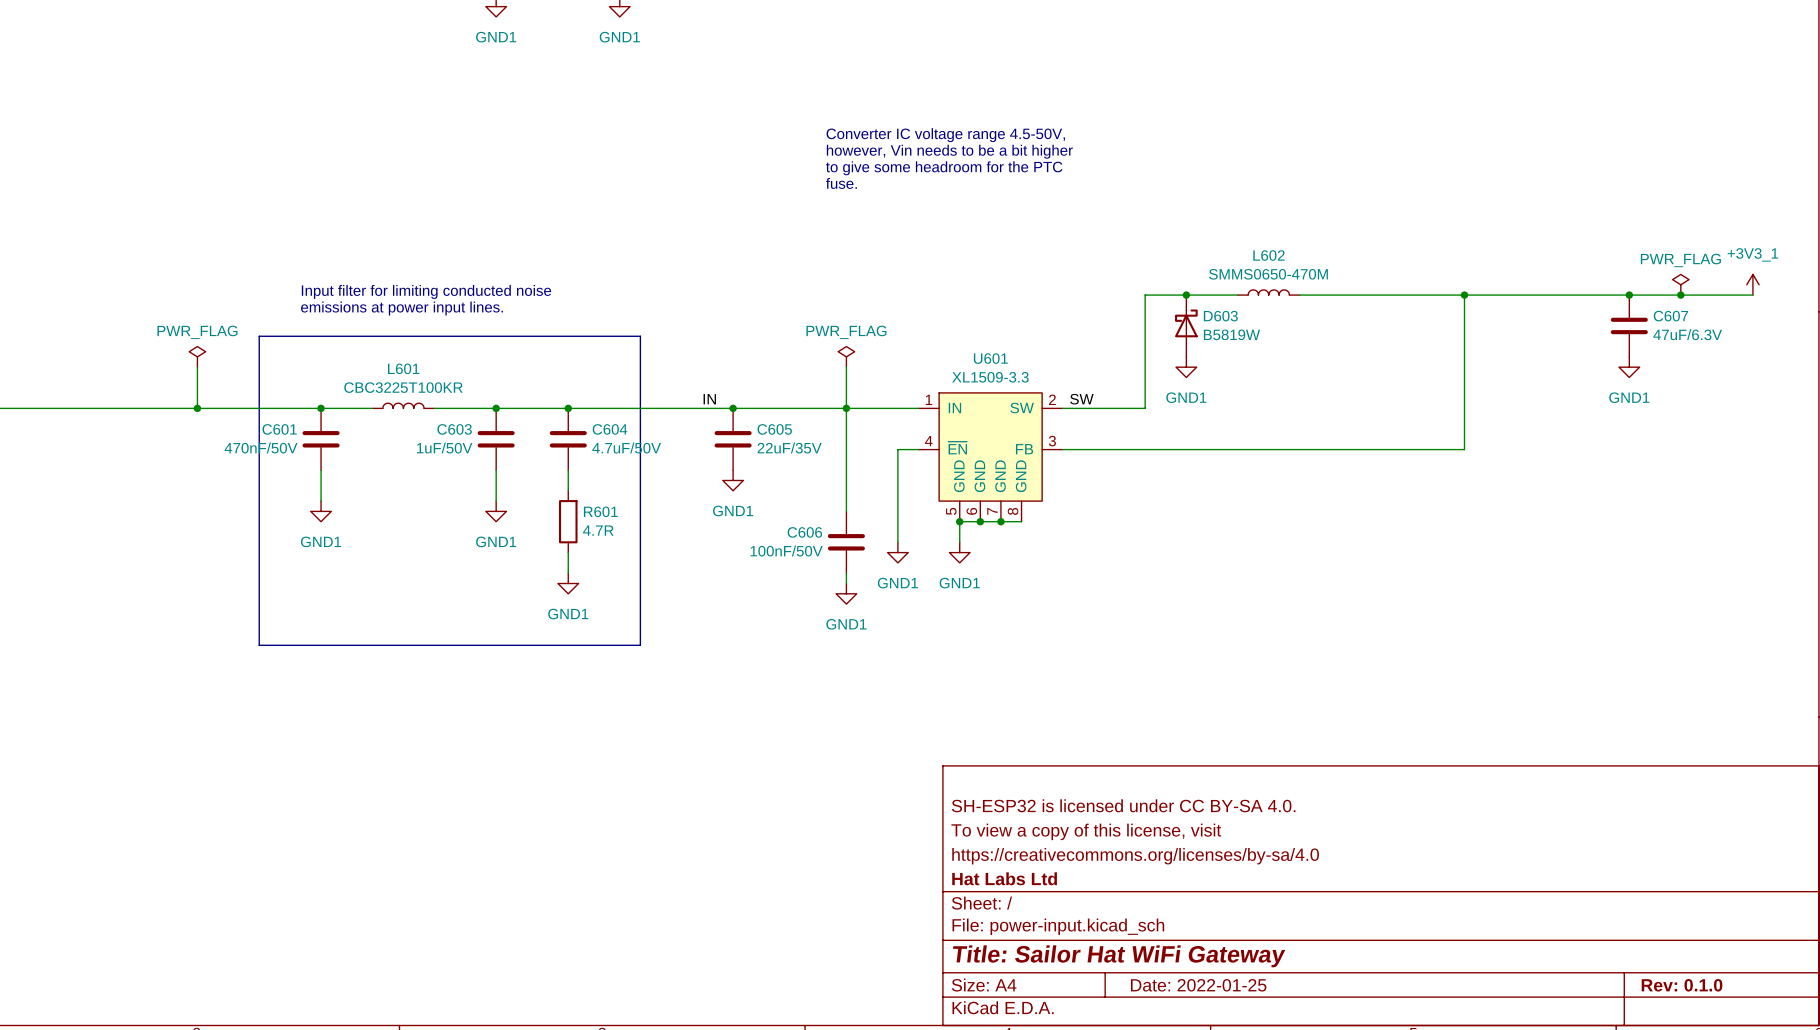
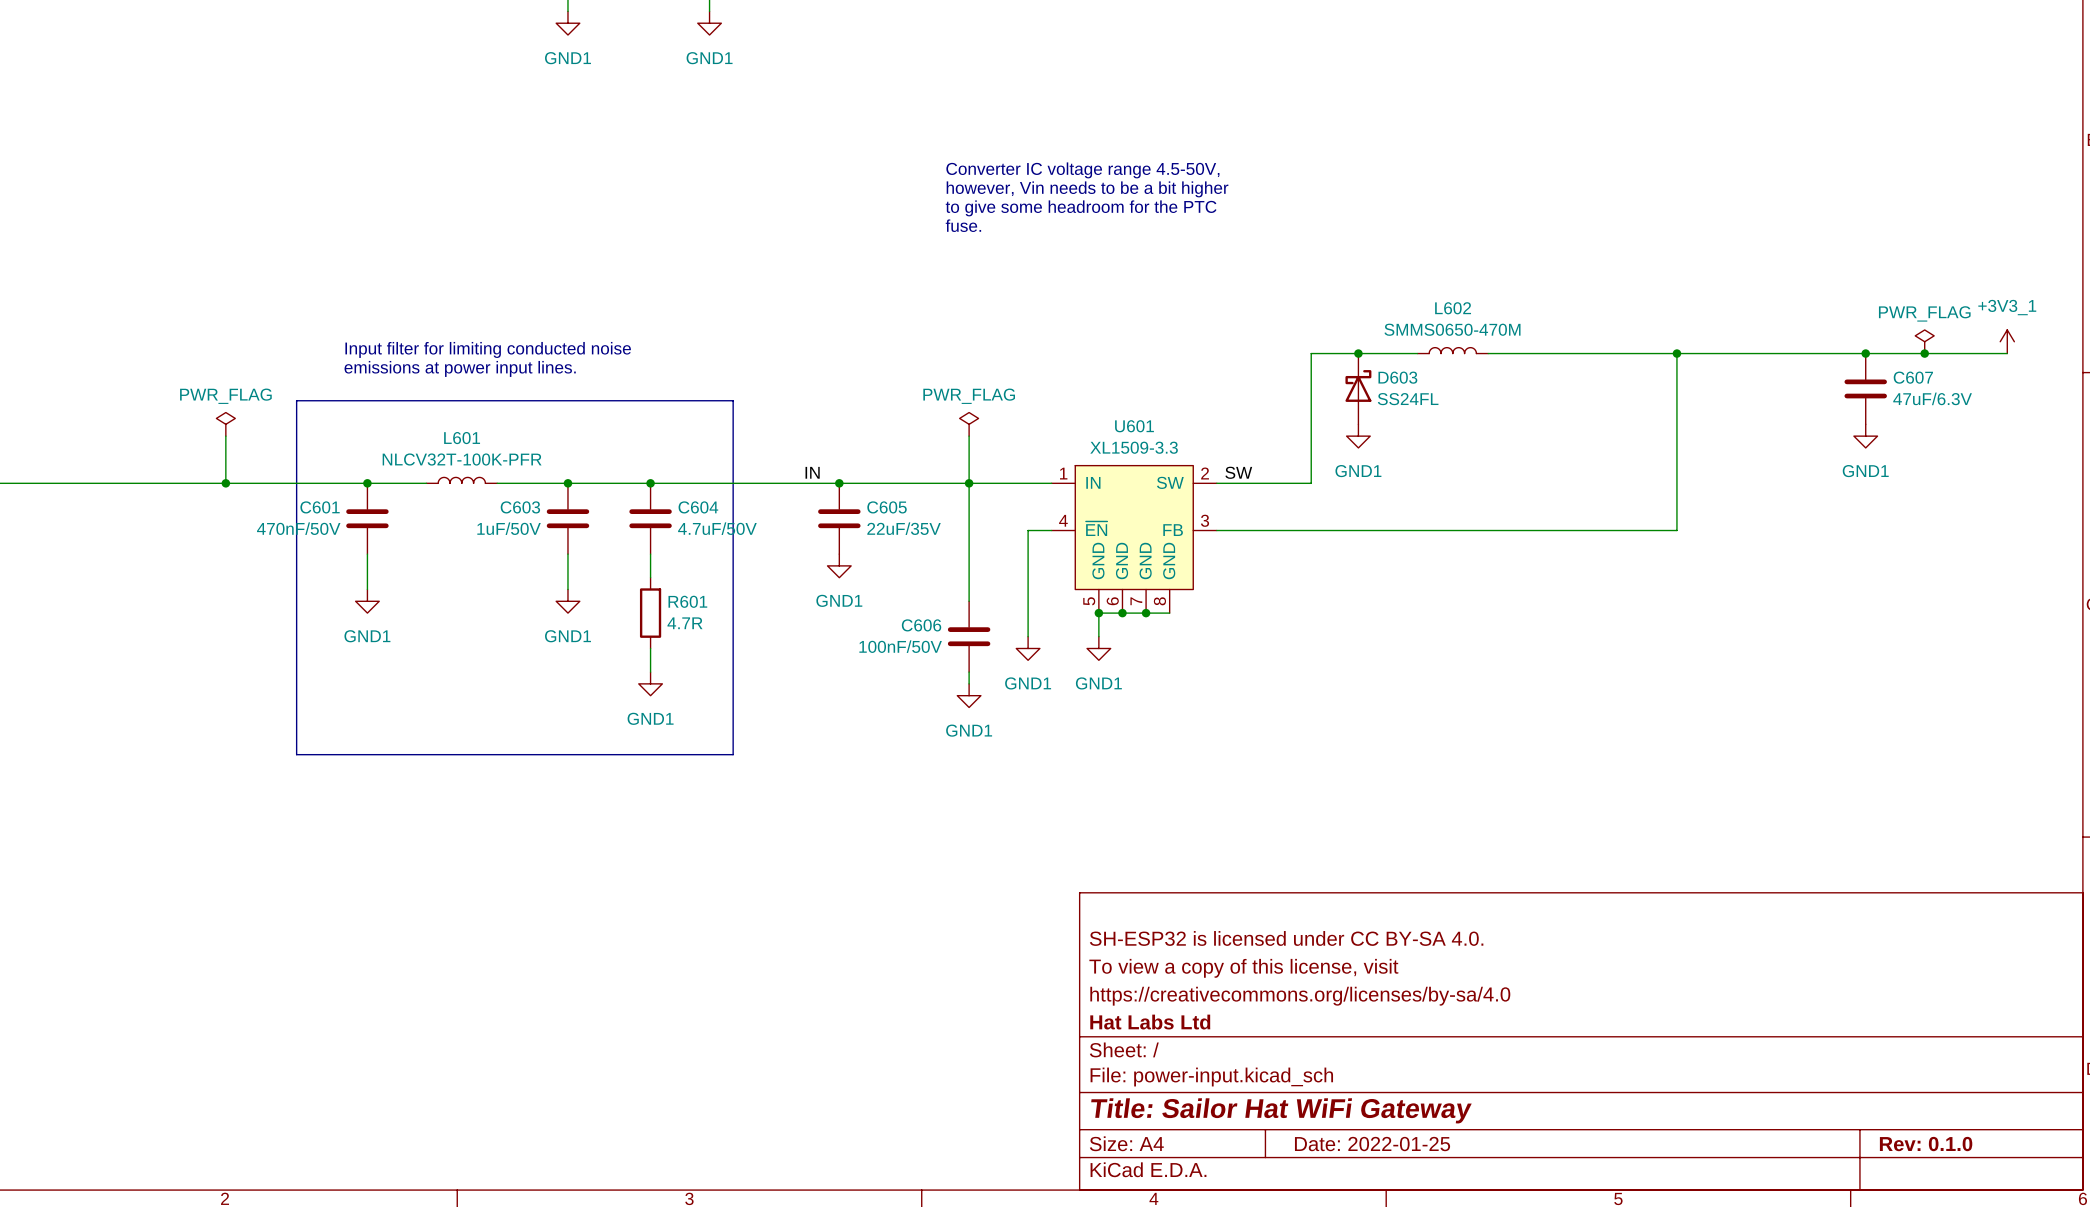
D603 value: B5819W (1231, 334) -> SS24FL (1408, 399)
L601 value: CBC3225T100KR (403, 387) -> NLCV32T-100K-PFR (462, 459)

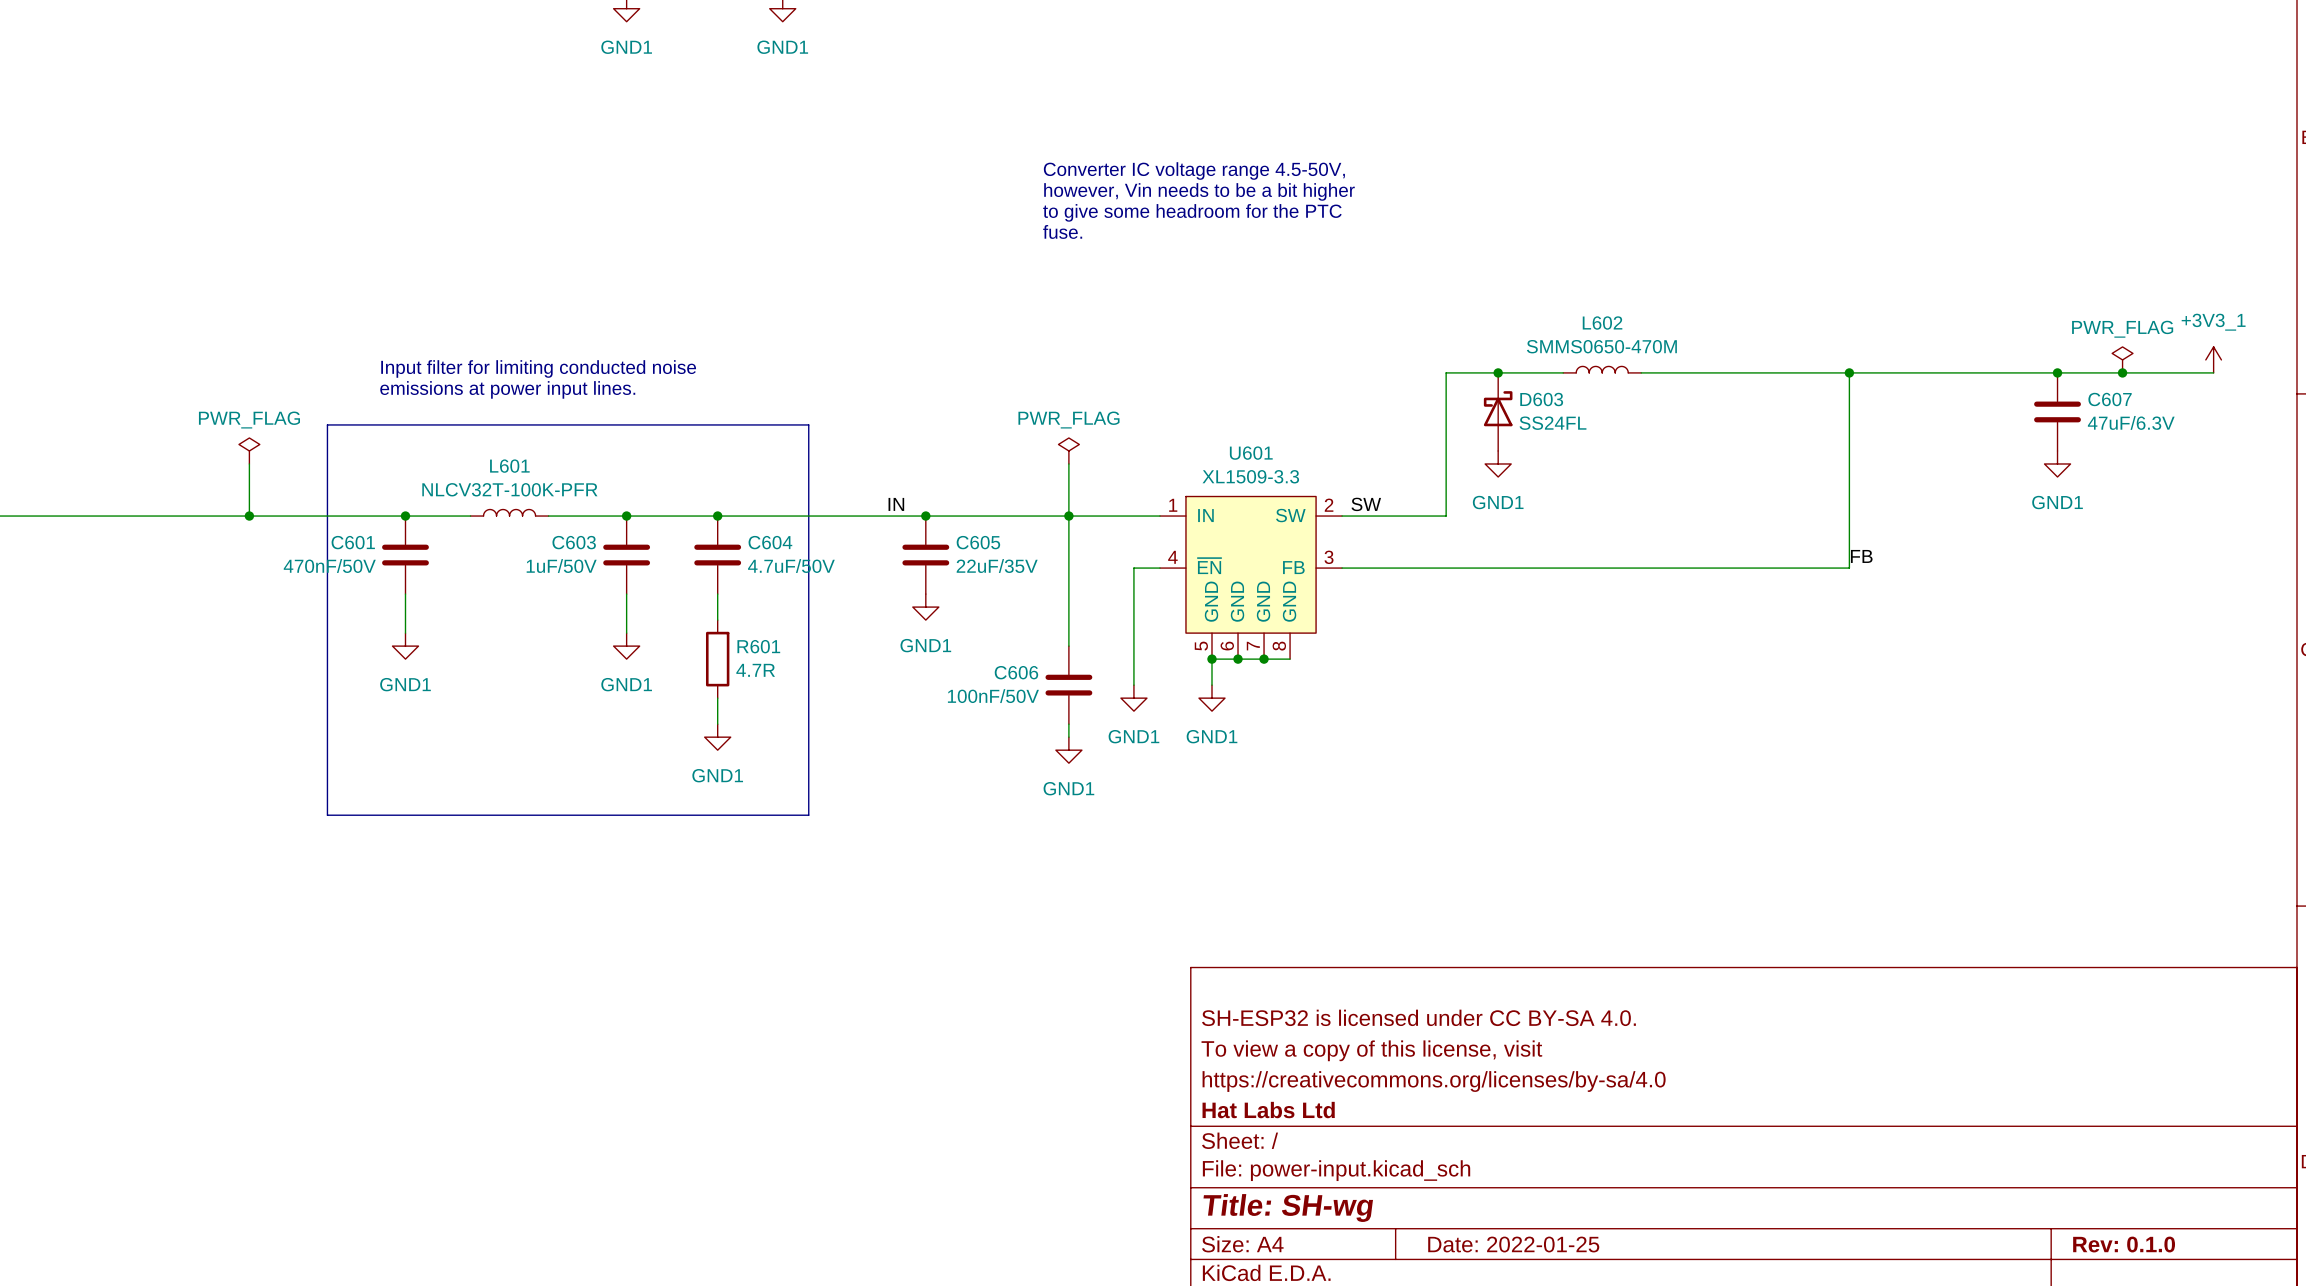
label: none -> FB (1861, 556)
title block: Title: Sailor Hat WiFi Gateway (1281, 1110) -> Title: SH-wg (1288, 1208)

